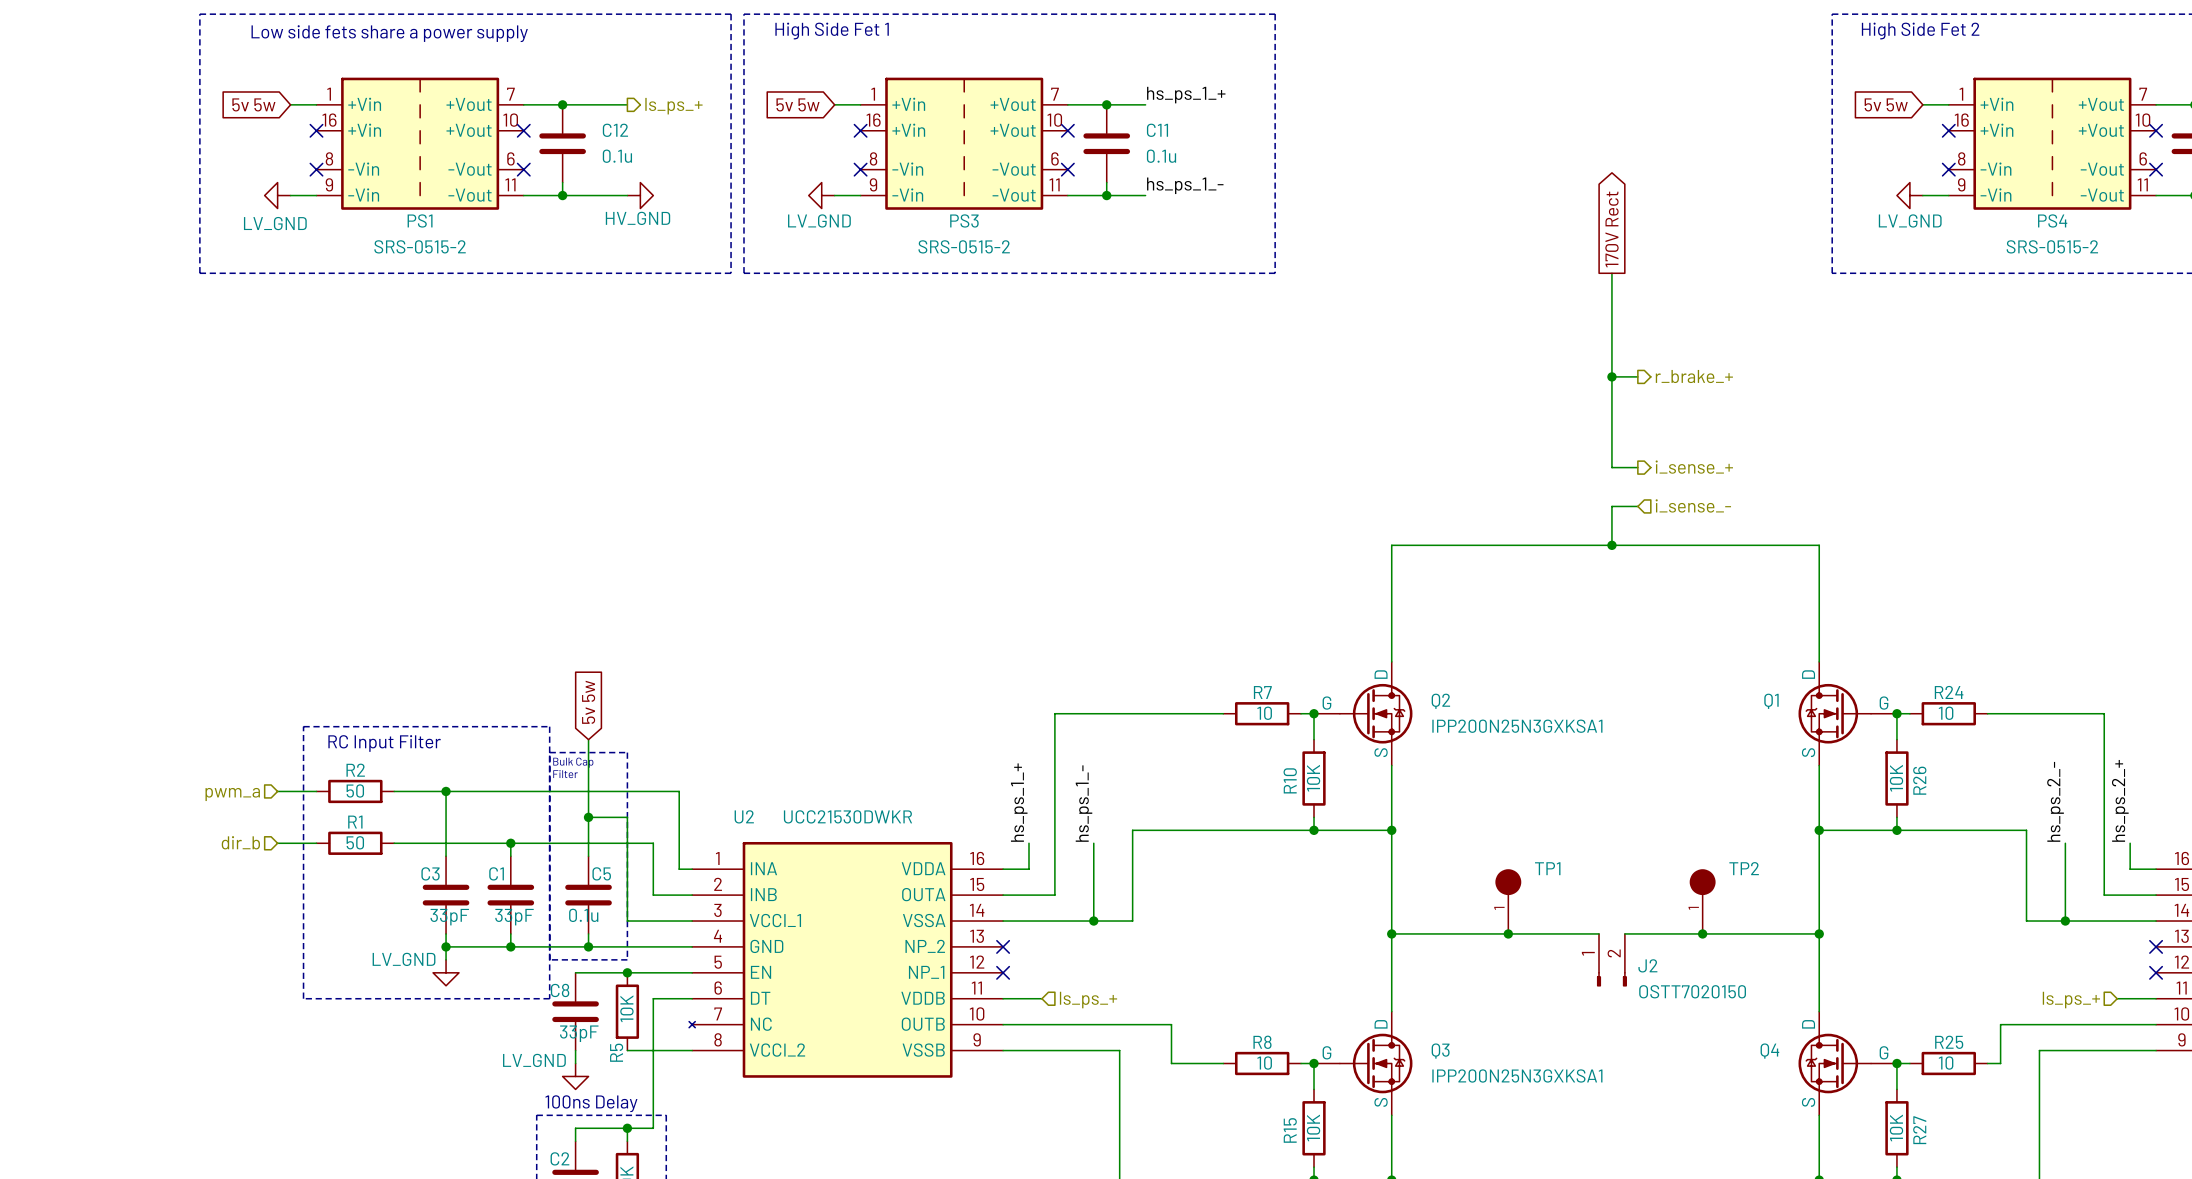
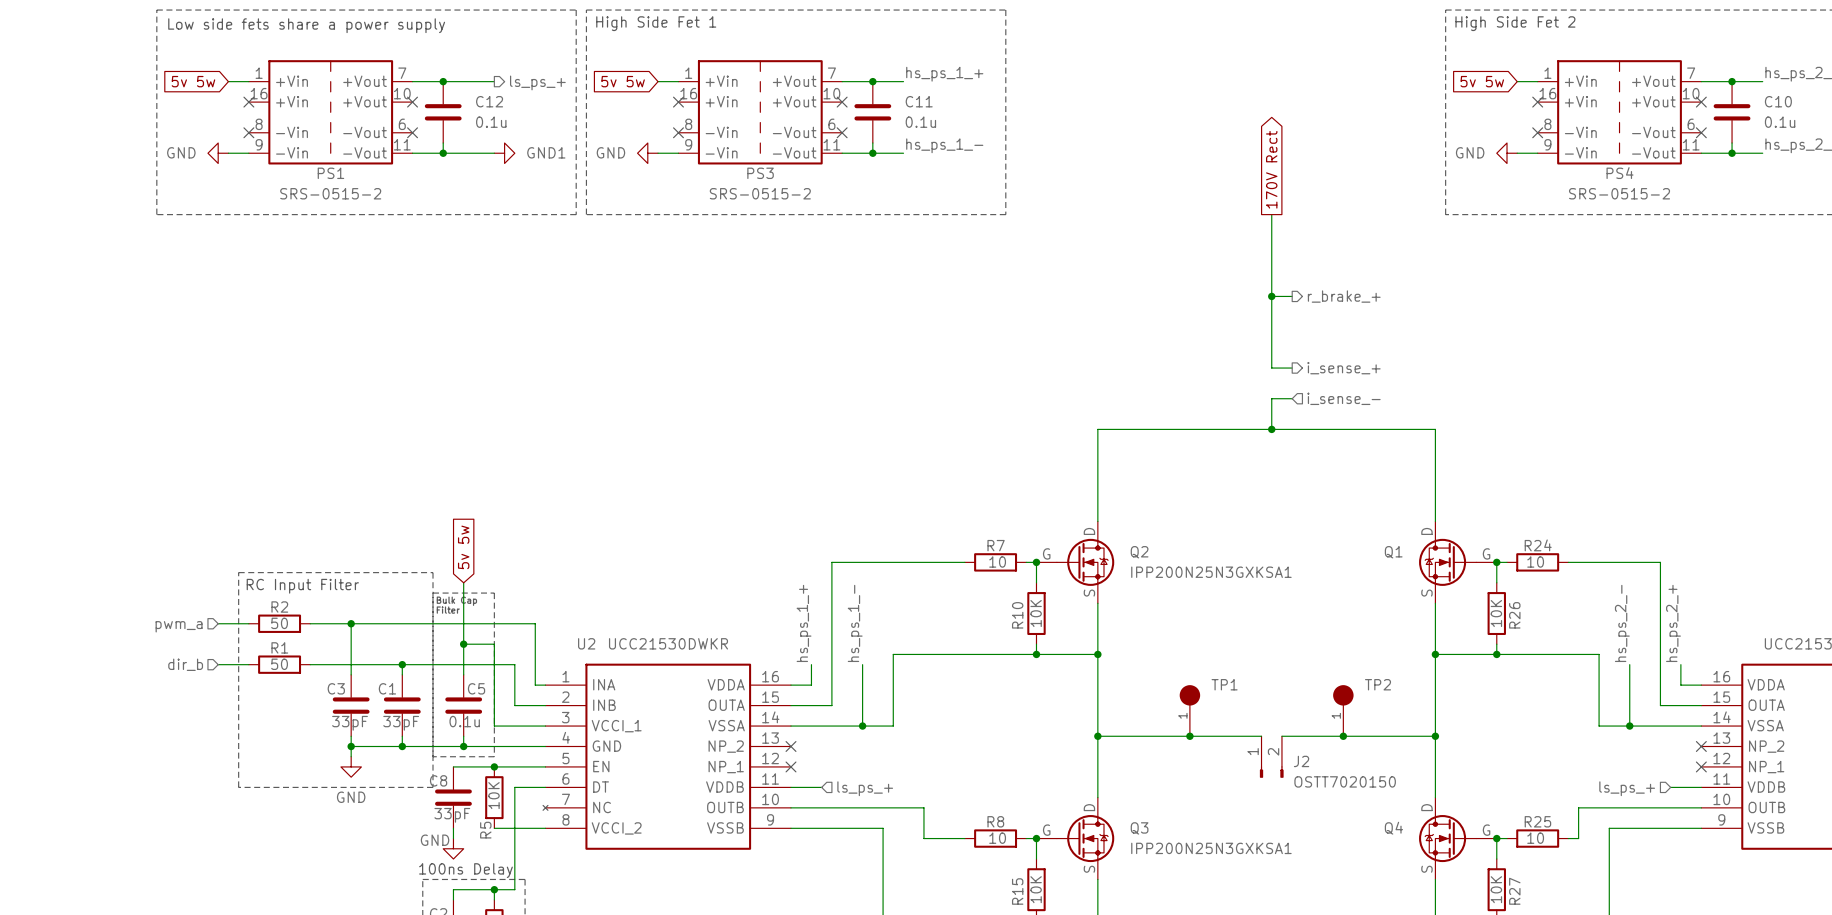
power symbol: LV_GND (277, 195) -> GND (218, 153)
power symbol: HV_GND (640, 195) -> GND1 (504, 153)
power symbol: LV_GND (821, 195) -> GND (647, 153)
power symbol: LV_GND (1909, 195) -> GND (1507, 153)
power symbol: LV_GND (446, 972) -> GND (351, 766)
power symbol: LV_GND (575, 1076) -> GND (453, 848)

